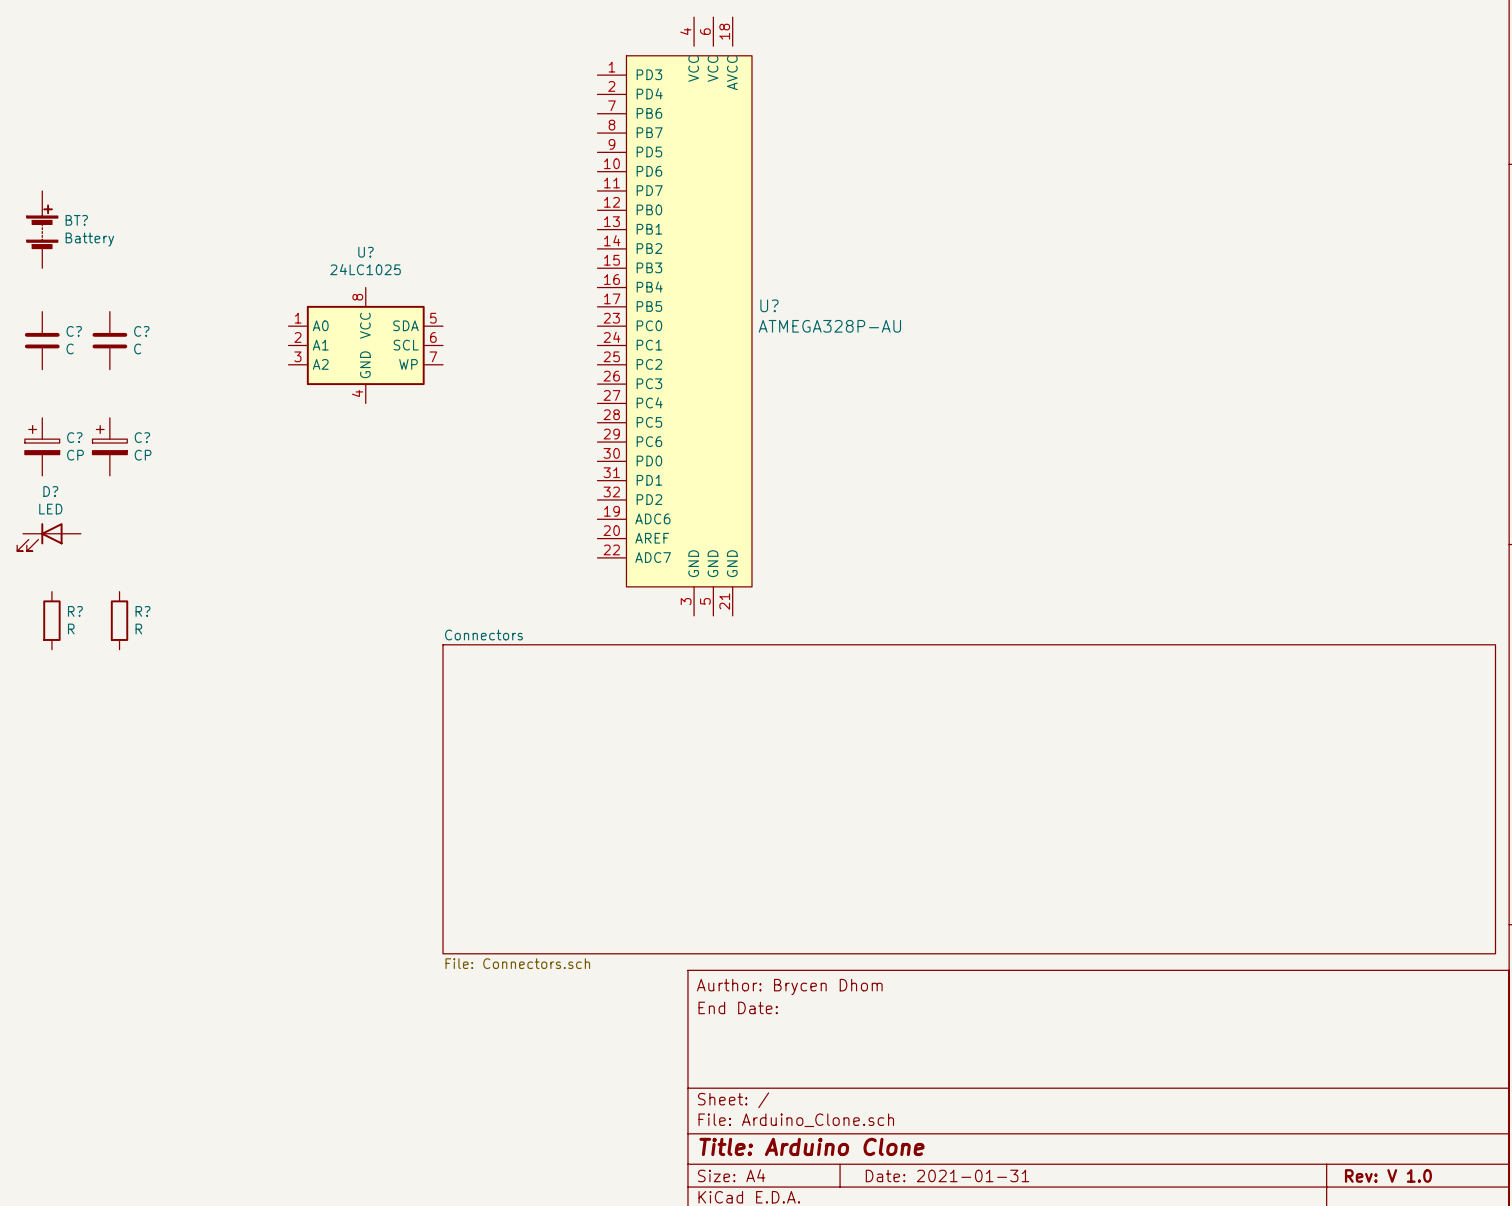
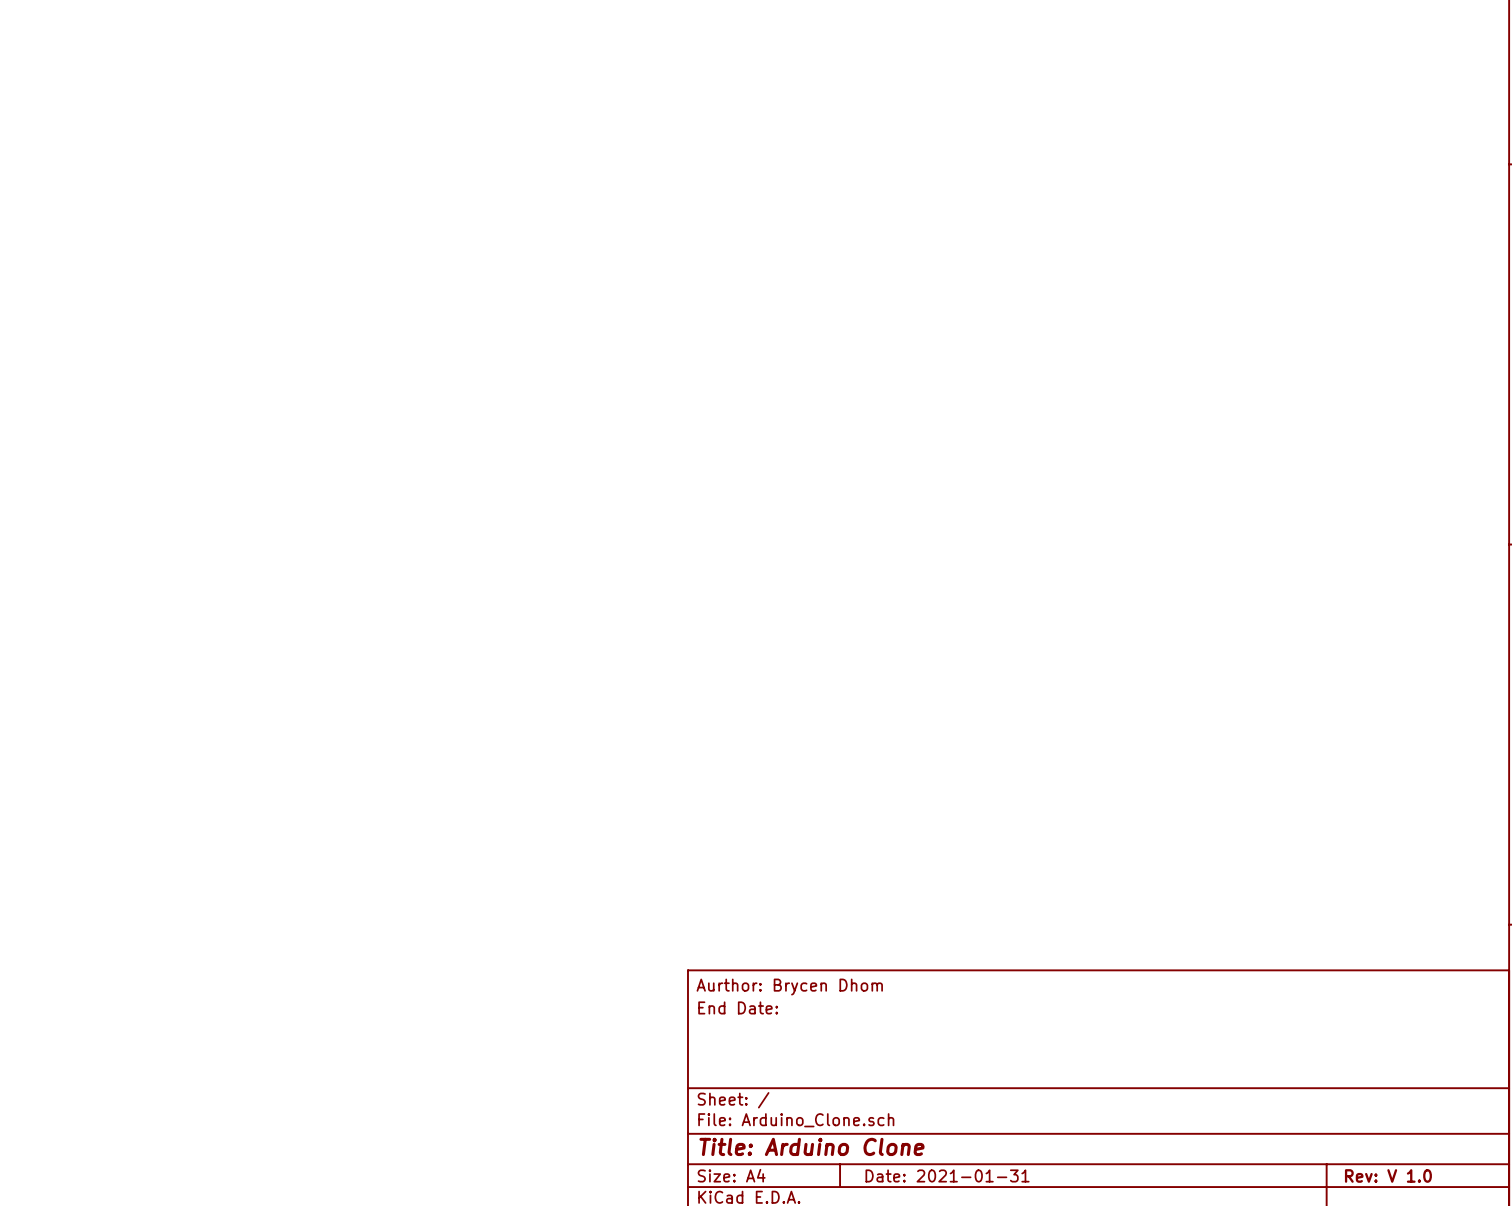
BT?: Battery (42, 229) -> none
U?: ATMEGA328P-AU (674, 316) -> none
C?: C (42, 340) -> none
C?: C (109, 340) -> none
U?: 24LC1025 (365, 345) -> none
C?: CP (42, 446) -> none
C?: CP (109, 446) -> none
D?: LED (49, 537) -> none
R?: R (51, 620) -> none
R?: R (119, 620) -> none
sheet Connectors: File: Connectors.sch (969, 799) -> none

